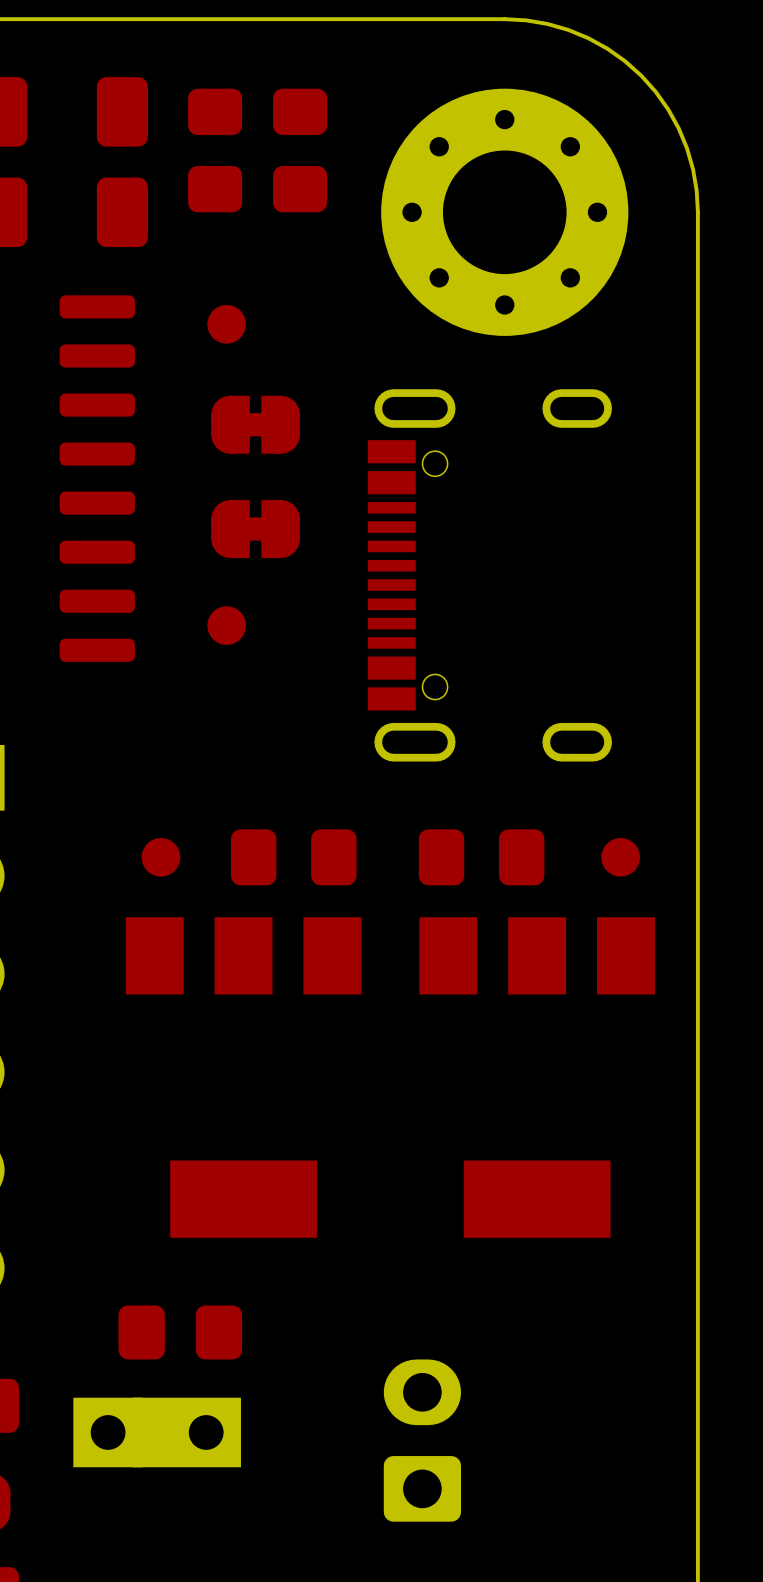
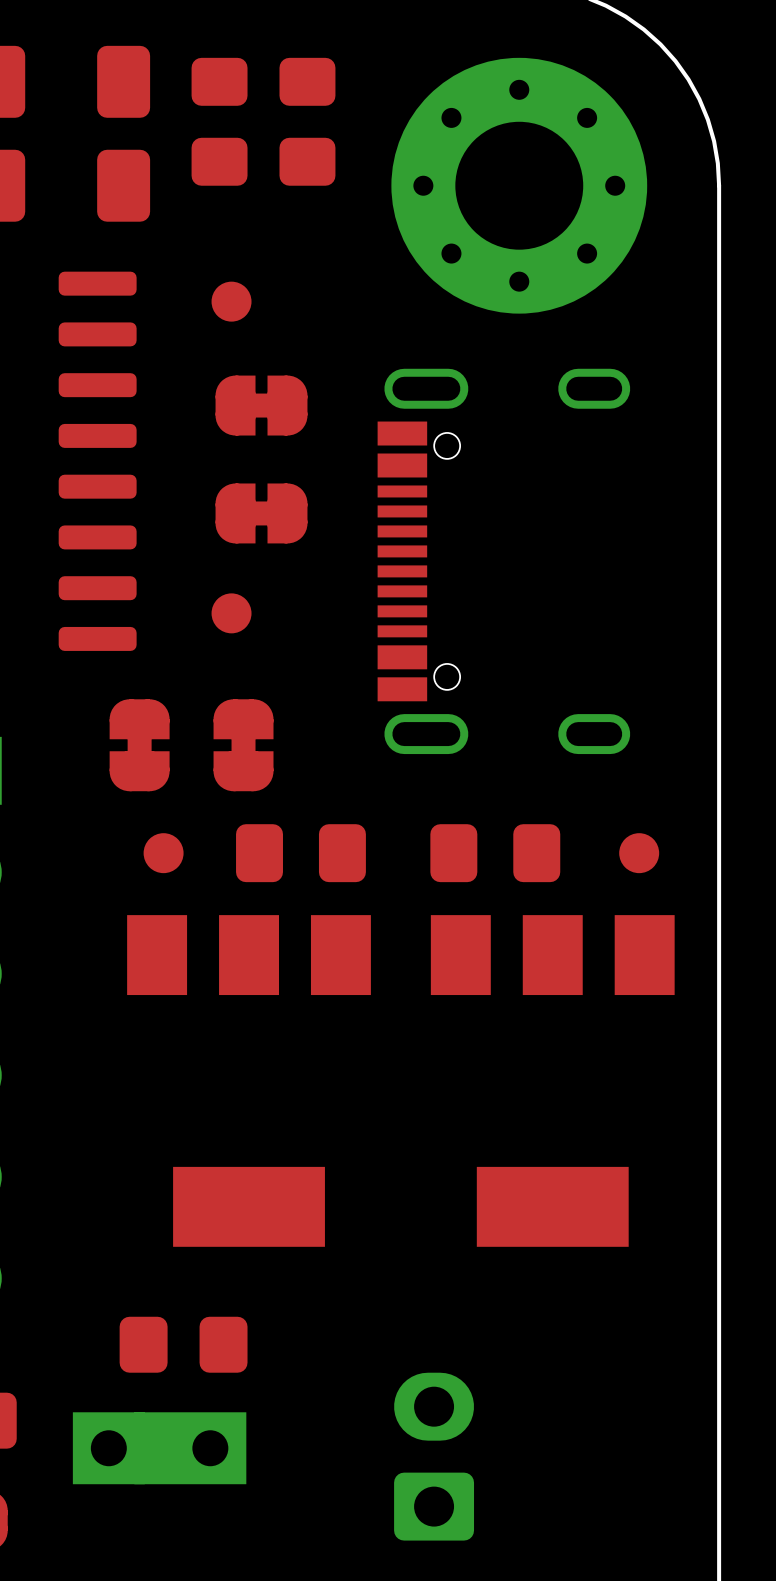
part: none -> (139, 745)
part: none -> (243, 745)

